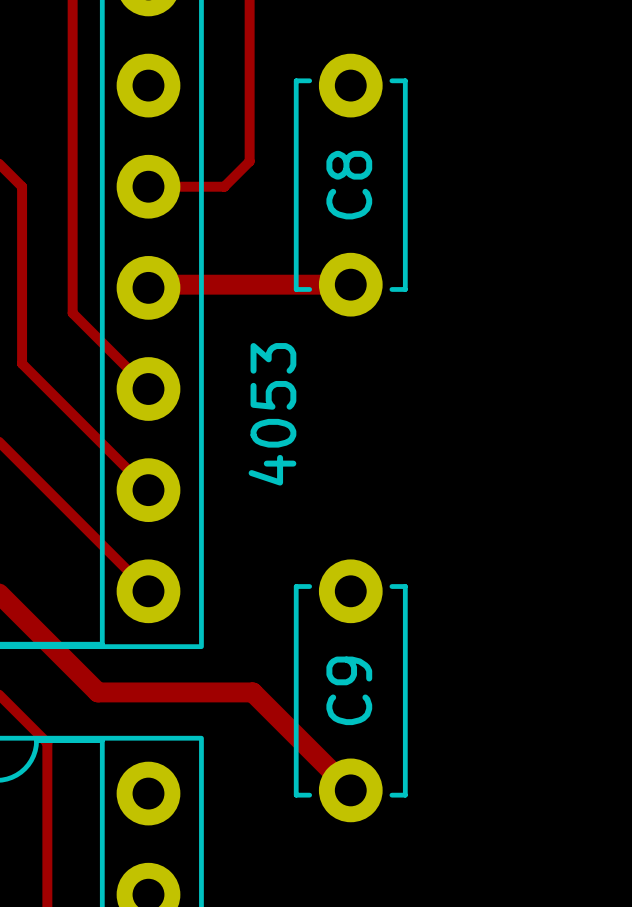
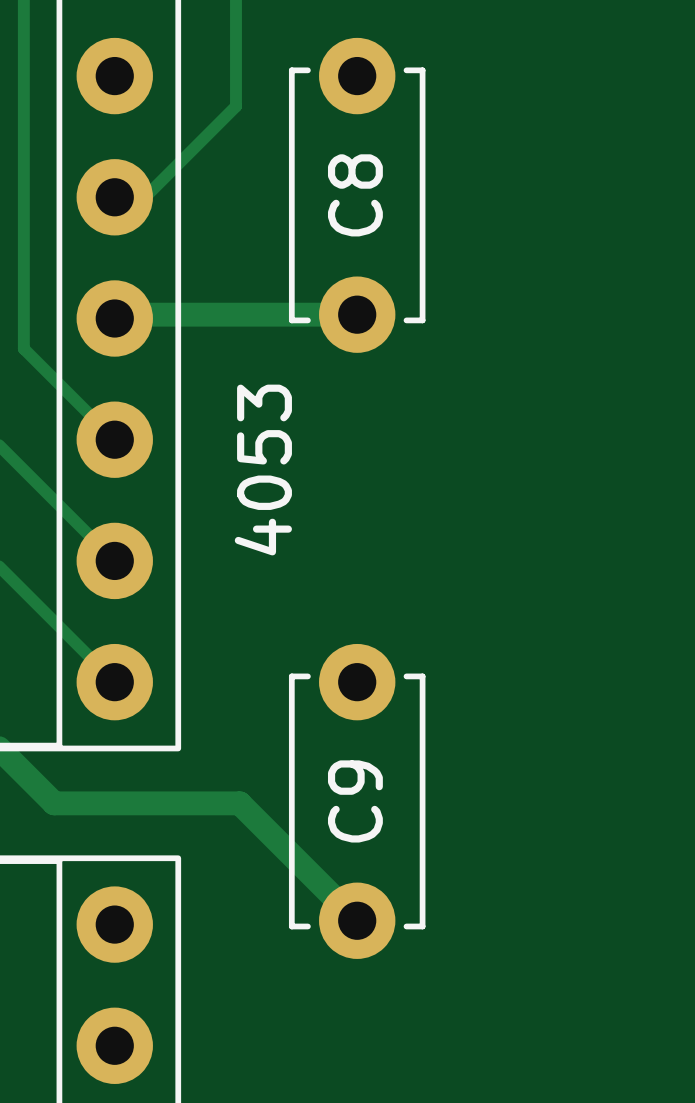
track: (249, 110) (249, 161) (224, 186) (173, 186) -> (235, 106) (145, 197)

